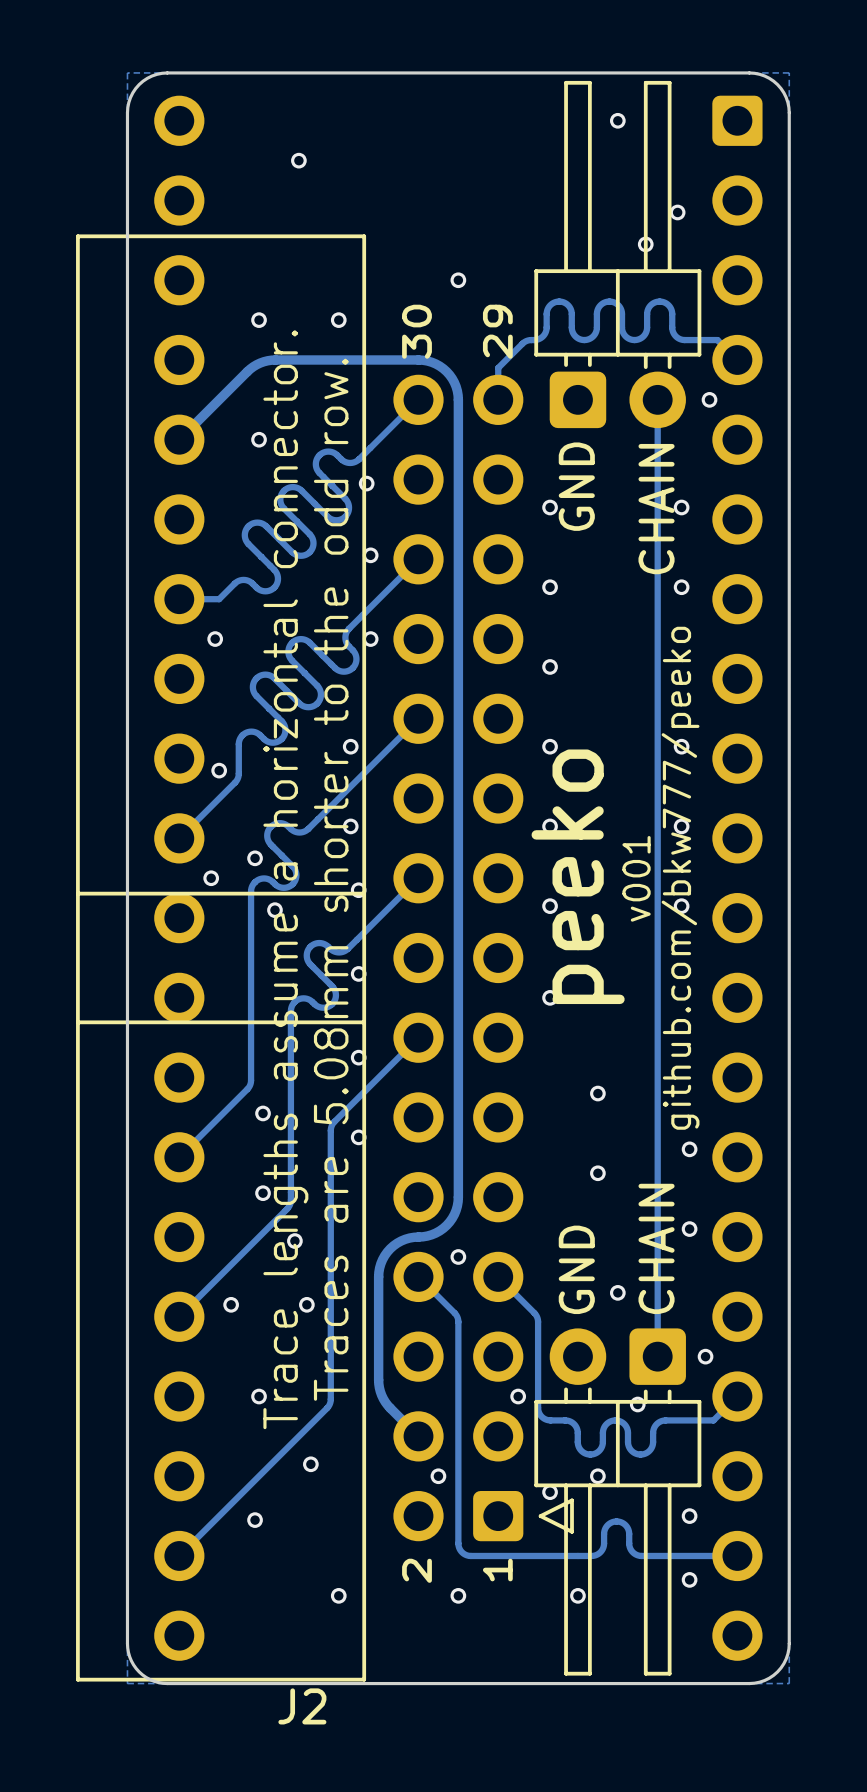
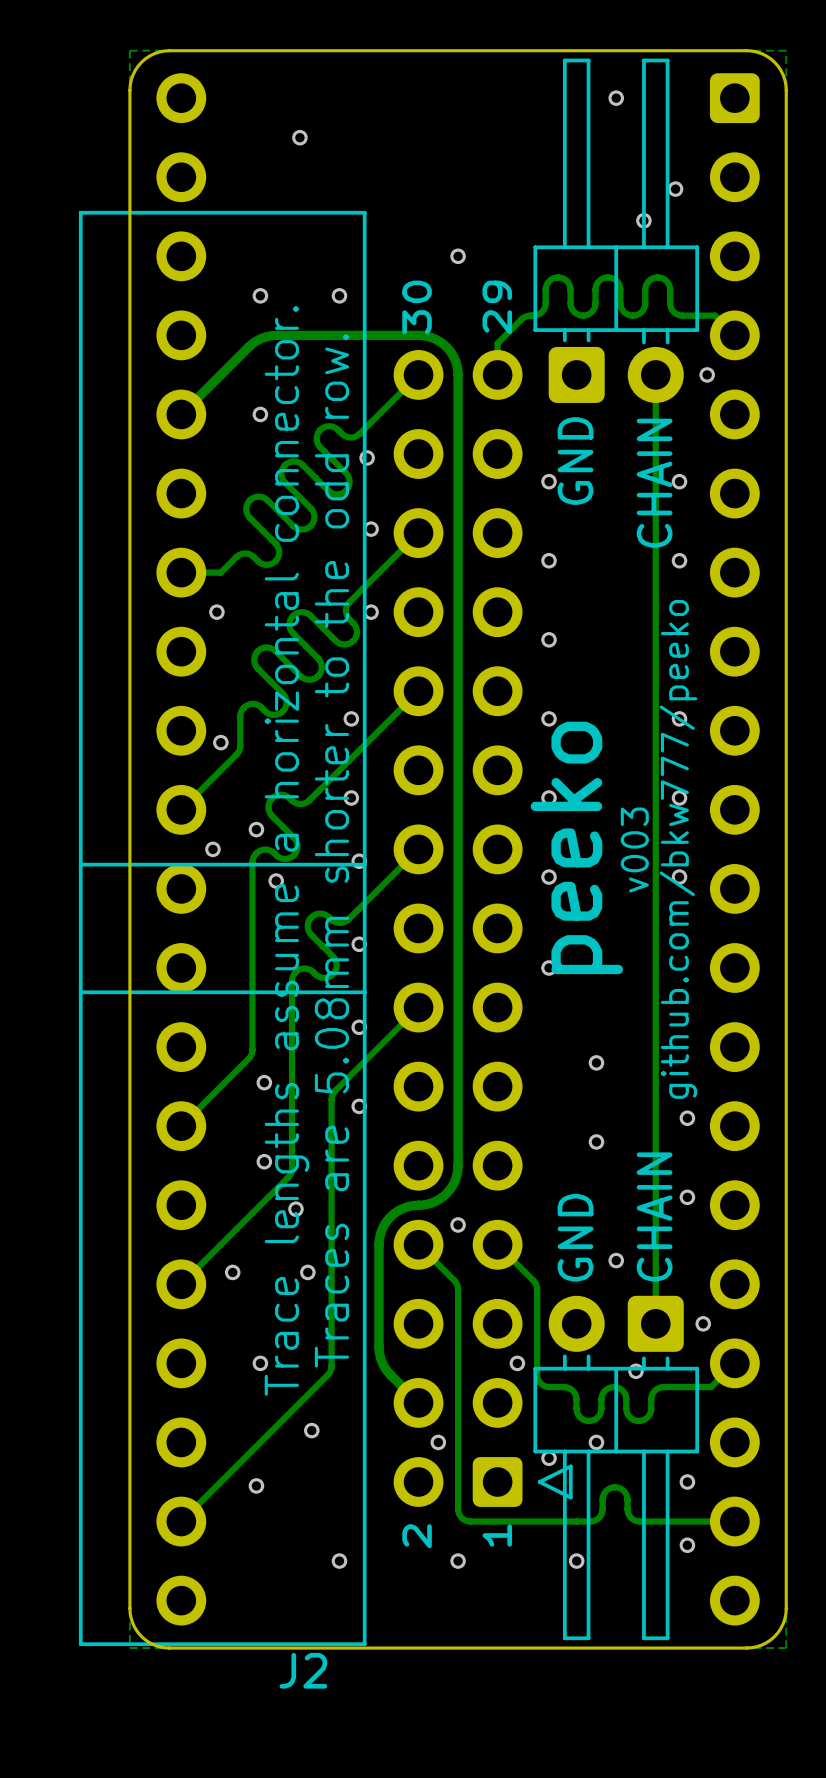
text: v001 (636, 878) -> v003 (634, 849)

